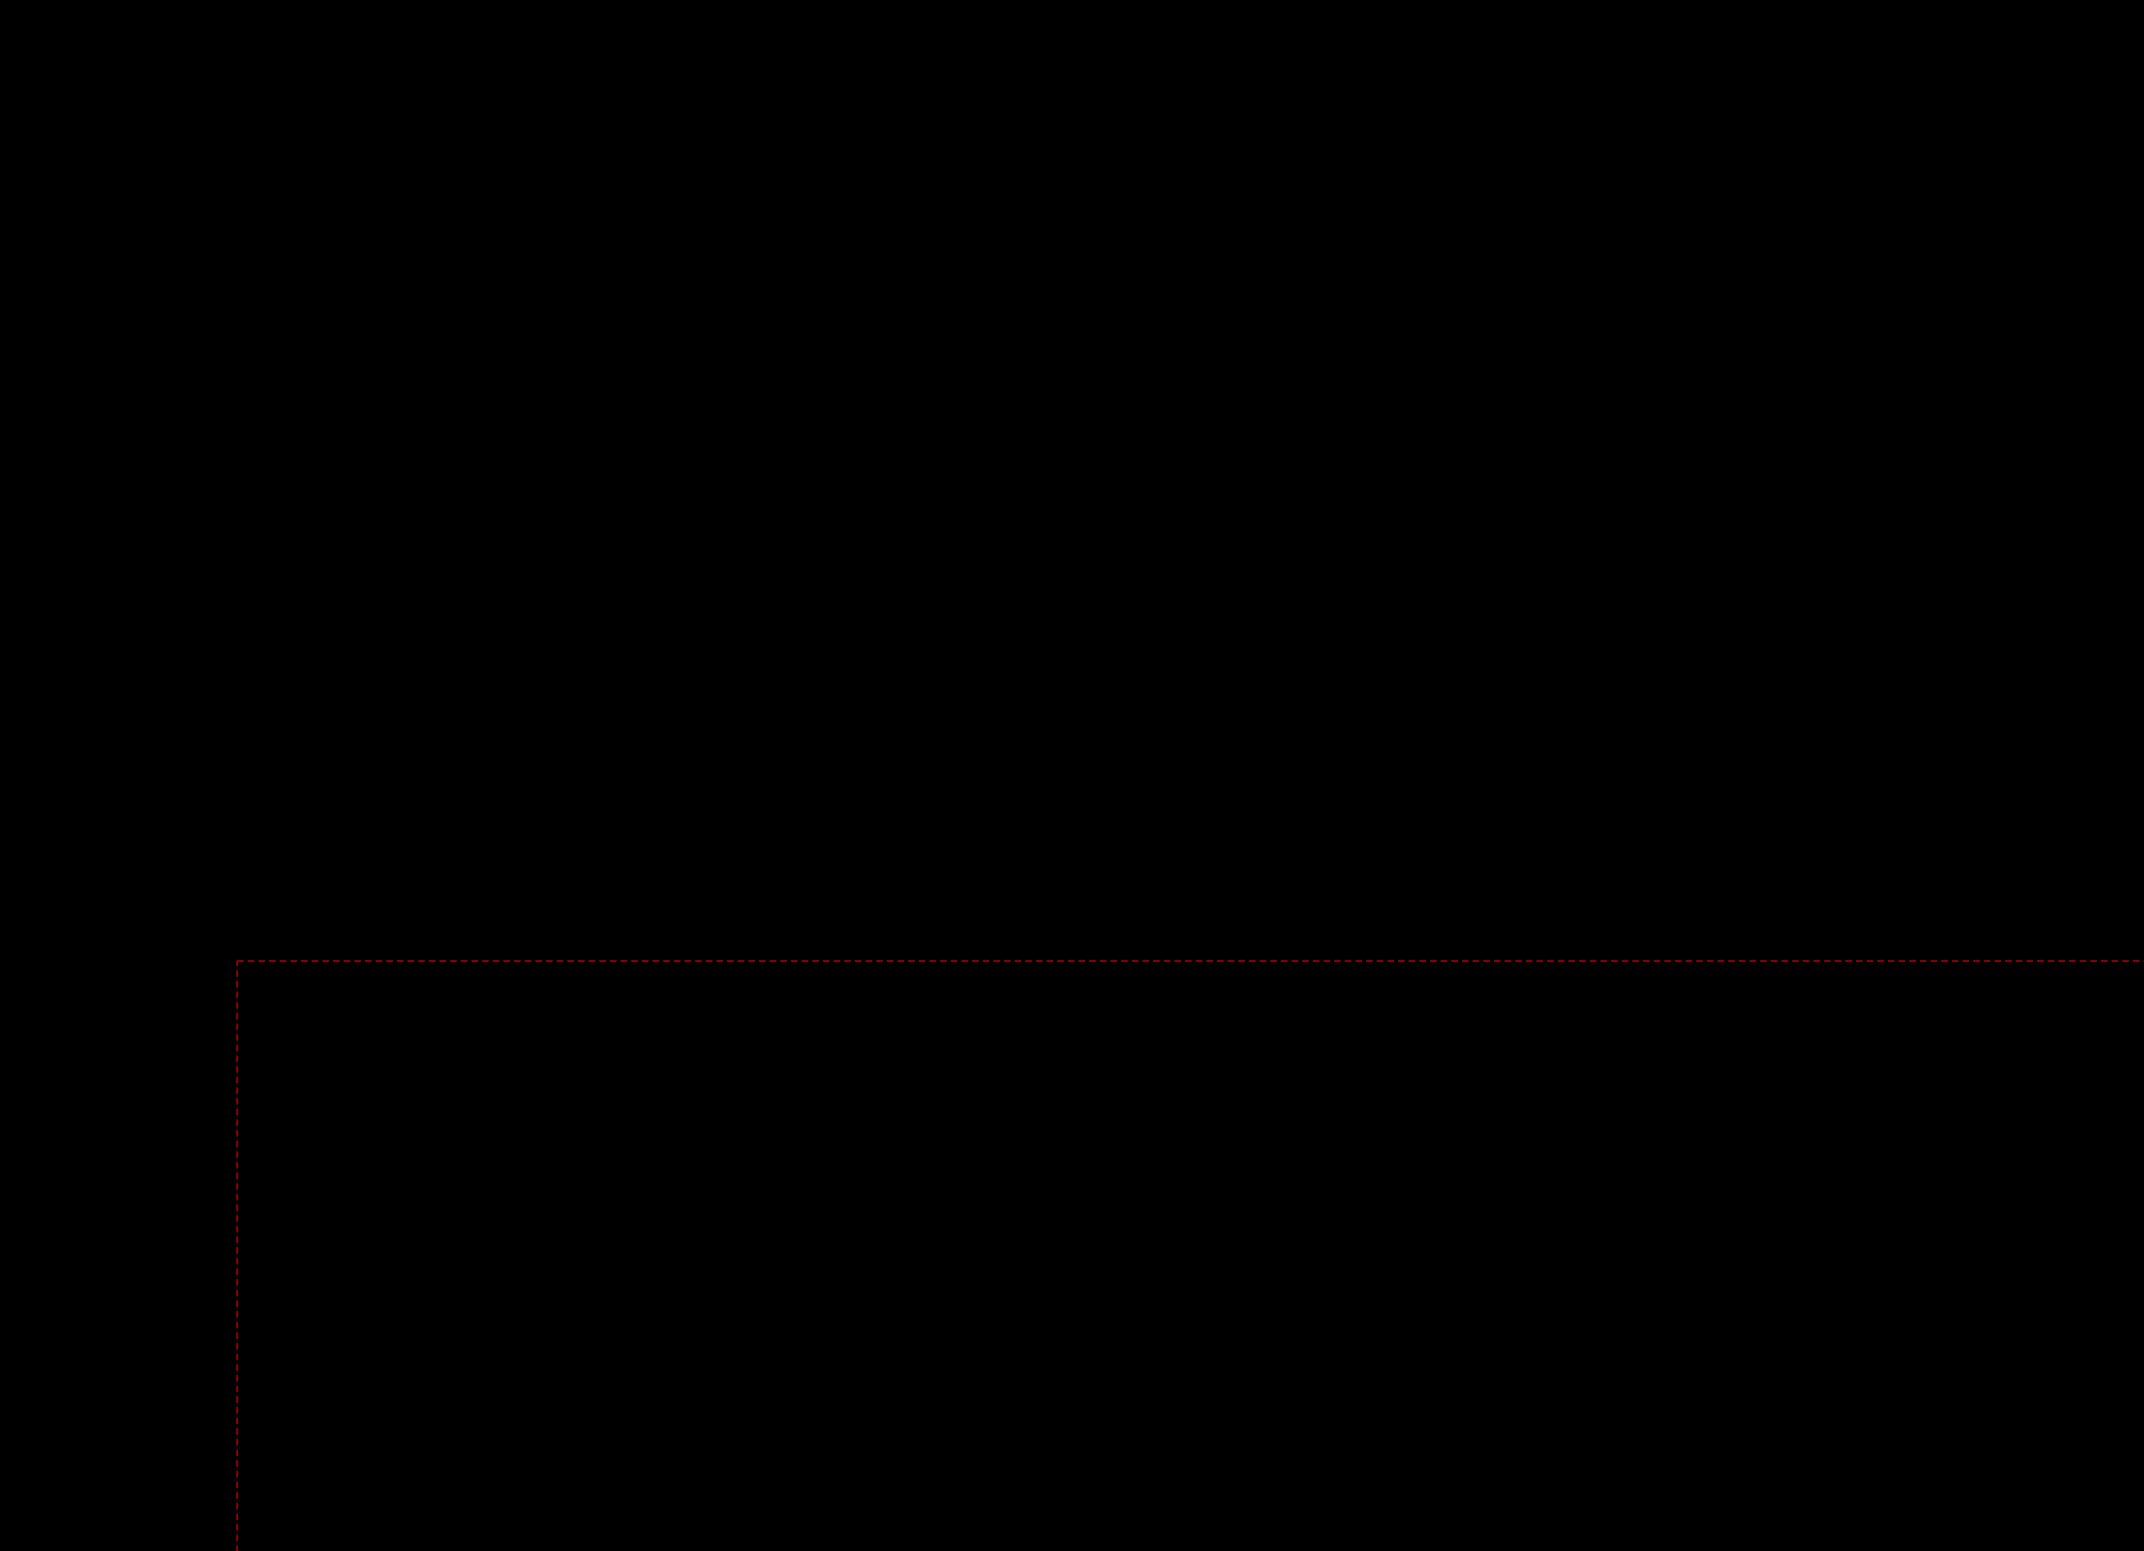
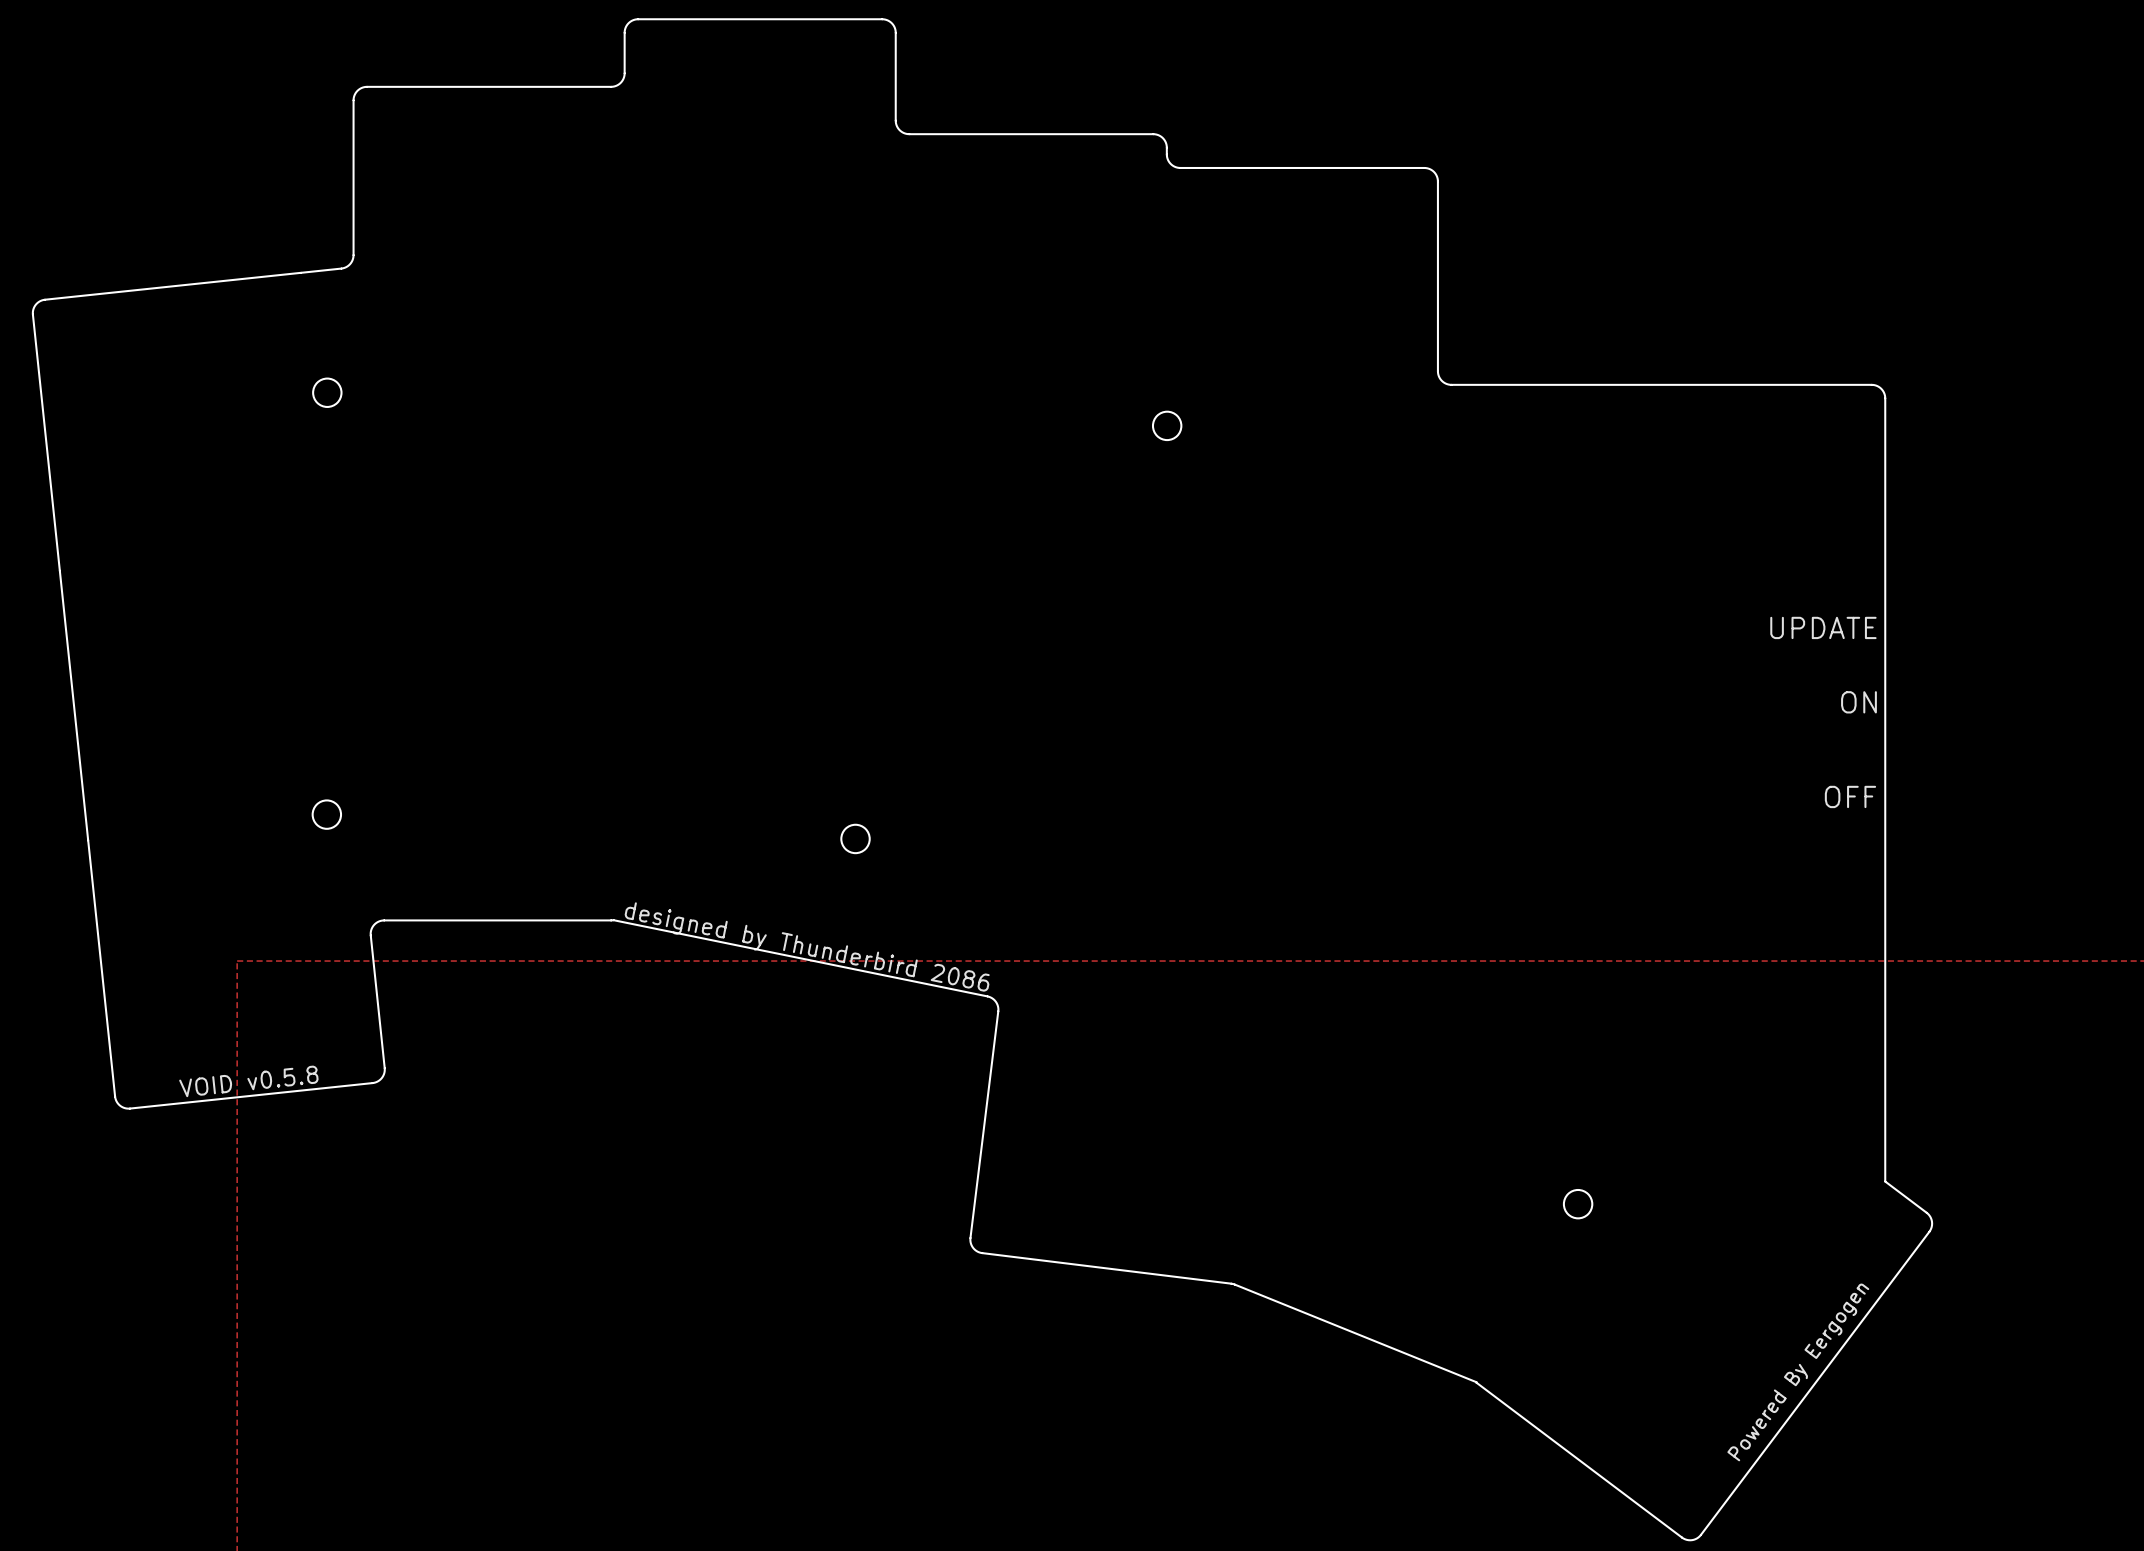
board edge: none -> (638, 19) (888, 20) (892, 24) (895, 31) (895, 122) (899, 130) (906, 133) (1154, 134) (1163, 139) (1168, 160) (1171, 165) (1178, 167) (1430, 169) (1435, 174) (1437, 181) (1438, 372) (1440, 379) (1447, 384) (1871, 384) (1877, 386) (1883, 391) (1885, 398) (1885, 1181) (1928, 1213) (1932, 1225) (1929, 1231) (1698, 1537) (1690, 1540) (1682, 1537) (1476, 1382) (1234, 1284) (982, 1253) (975, 1250) (971, 1244) (970, 1238) (998, 1009) (995, 1001) (989, 996) (613, 920) (382, 920) (374, 924) (370, 933) (384, 1068) (383, 1075) (378, 1081) (129, 1108) (122, 1107) (117, 1103) (115, 1096) (32, 314) (34, 307) (38, 302) (44, 299) (346, 267) (351, 262) (353, 256) (353, 100) (358, 89) (367, 86) (614, 86) (620, 82) (624, 76) (625, 28) (630, 21) (638, 19)
round board edge: none -> [312, 377, 343, 408]
round board edge: none -> [1151, 410, 1183, 442]
text: none -> UPDATE (1823, 627)
text: none -> ON (1858, 702)
text: none -> OFF (1850, 796)
round board edge: none -> [311, 799, 343, 830]
round board edge: none -> [840, 823, 871, 855]
text: none -> designed by Thunderbird 2086 (807, 946)
text: none -> VOID v0.5.8 (248, 1081)
round board edge: none -> [1562, 1188, 1594, 1220]
text: none -> Powered By Eergogen (1798, 1372)

